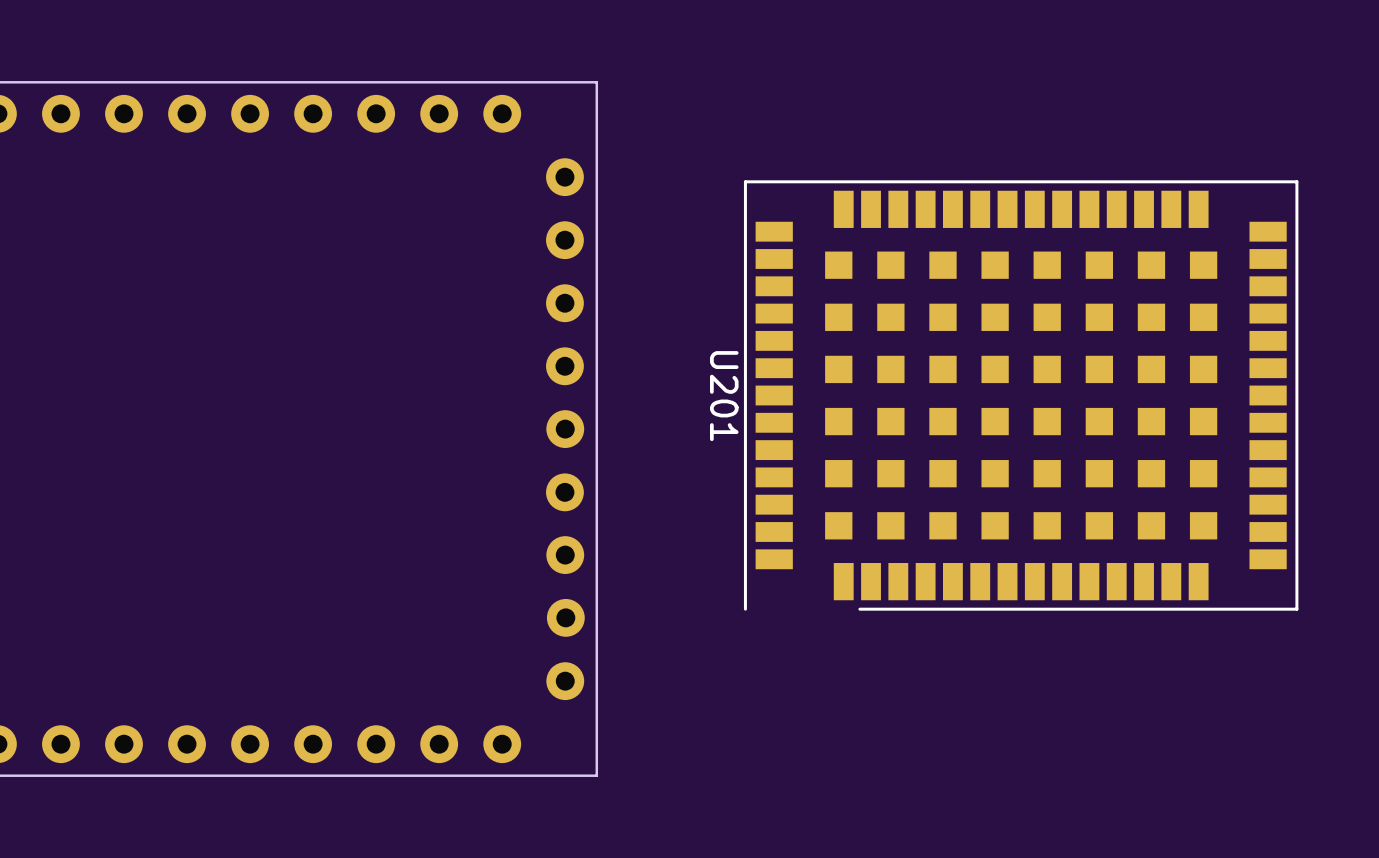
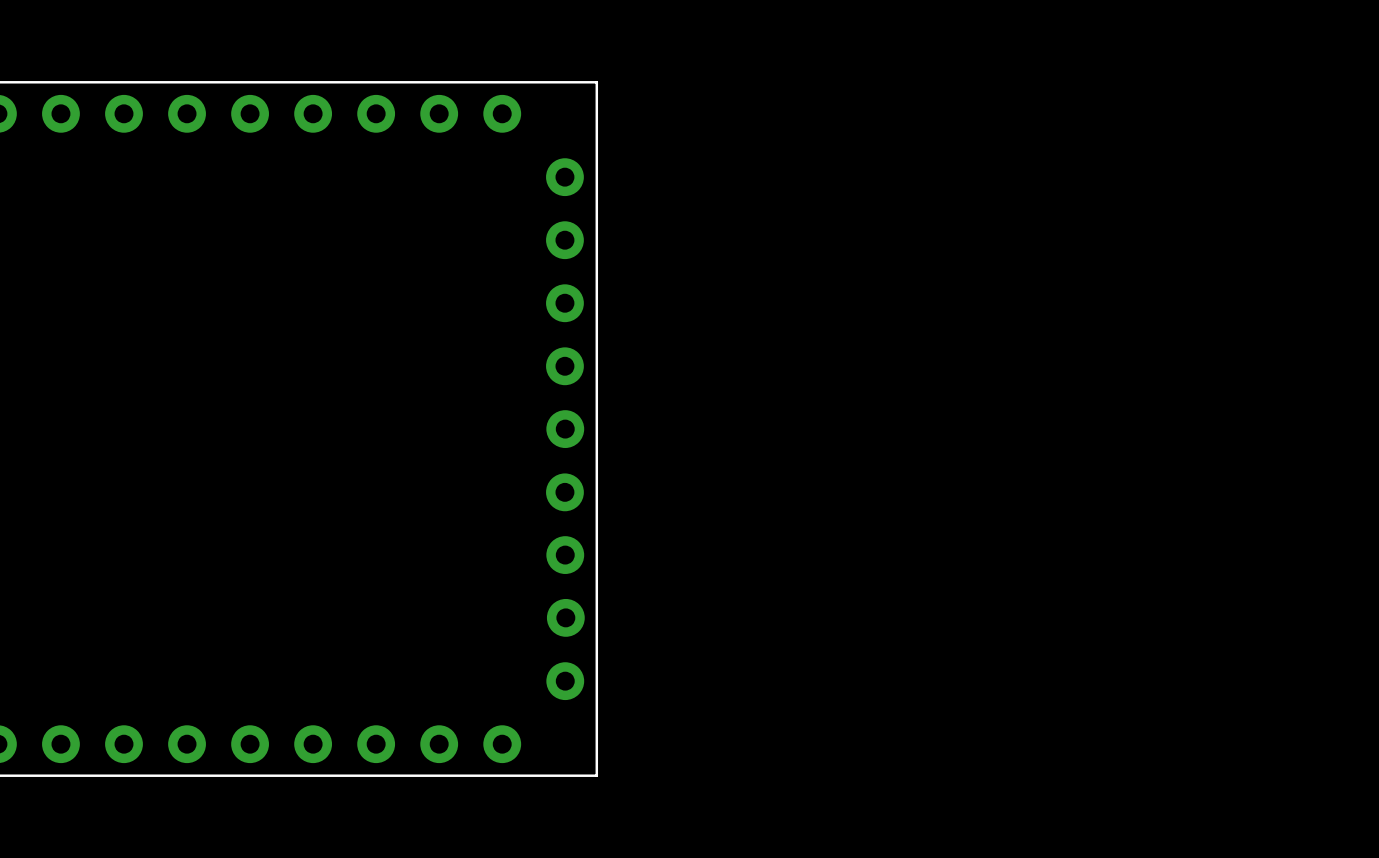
U201: (1021, 395) -> none

